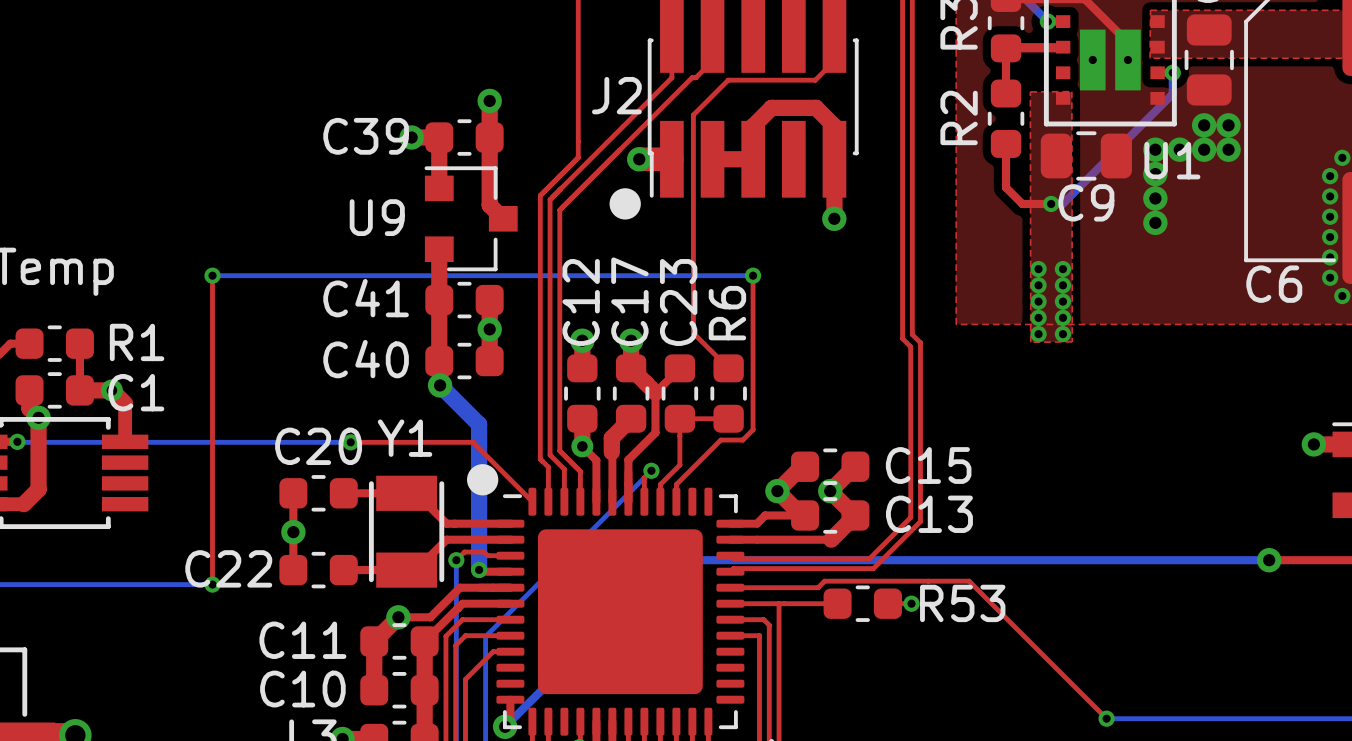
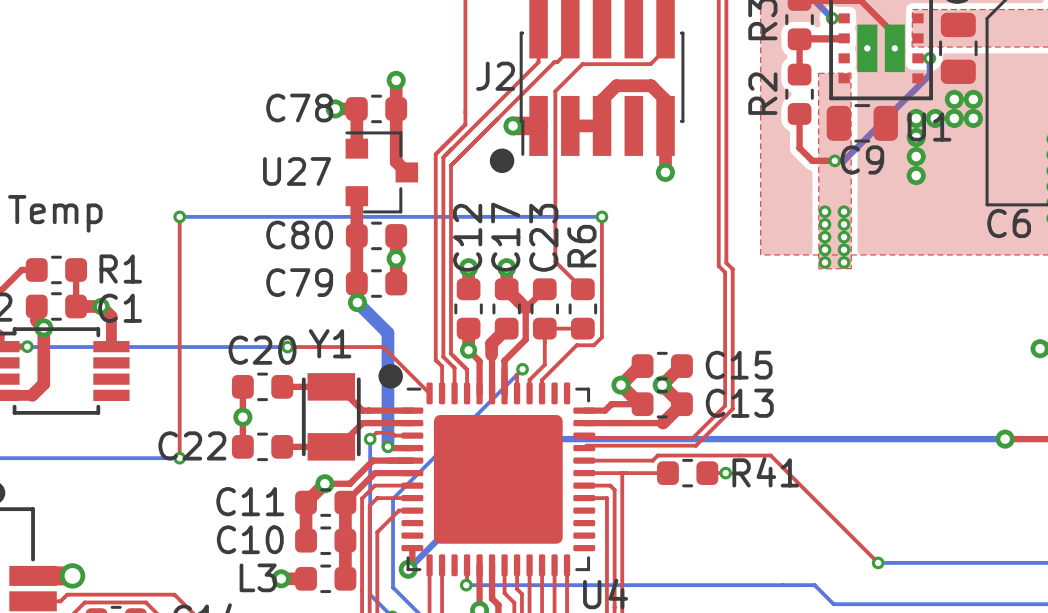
C39 name: C39 (366, 136) -> C78 (299, 107)
U9 name: U9 (377, 217) -> U27 (297, 171)
C41 name: C41 (366, 298) -> C80 (299, 234)
C40 name: C40 (366, 359) -> C79 (299, 282)
R53 name: R53 (962, 603) -> R41 (765, 472)

